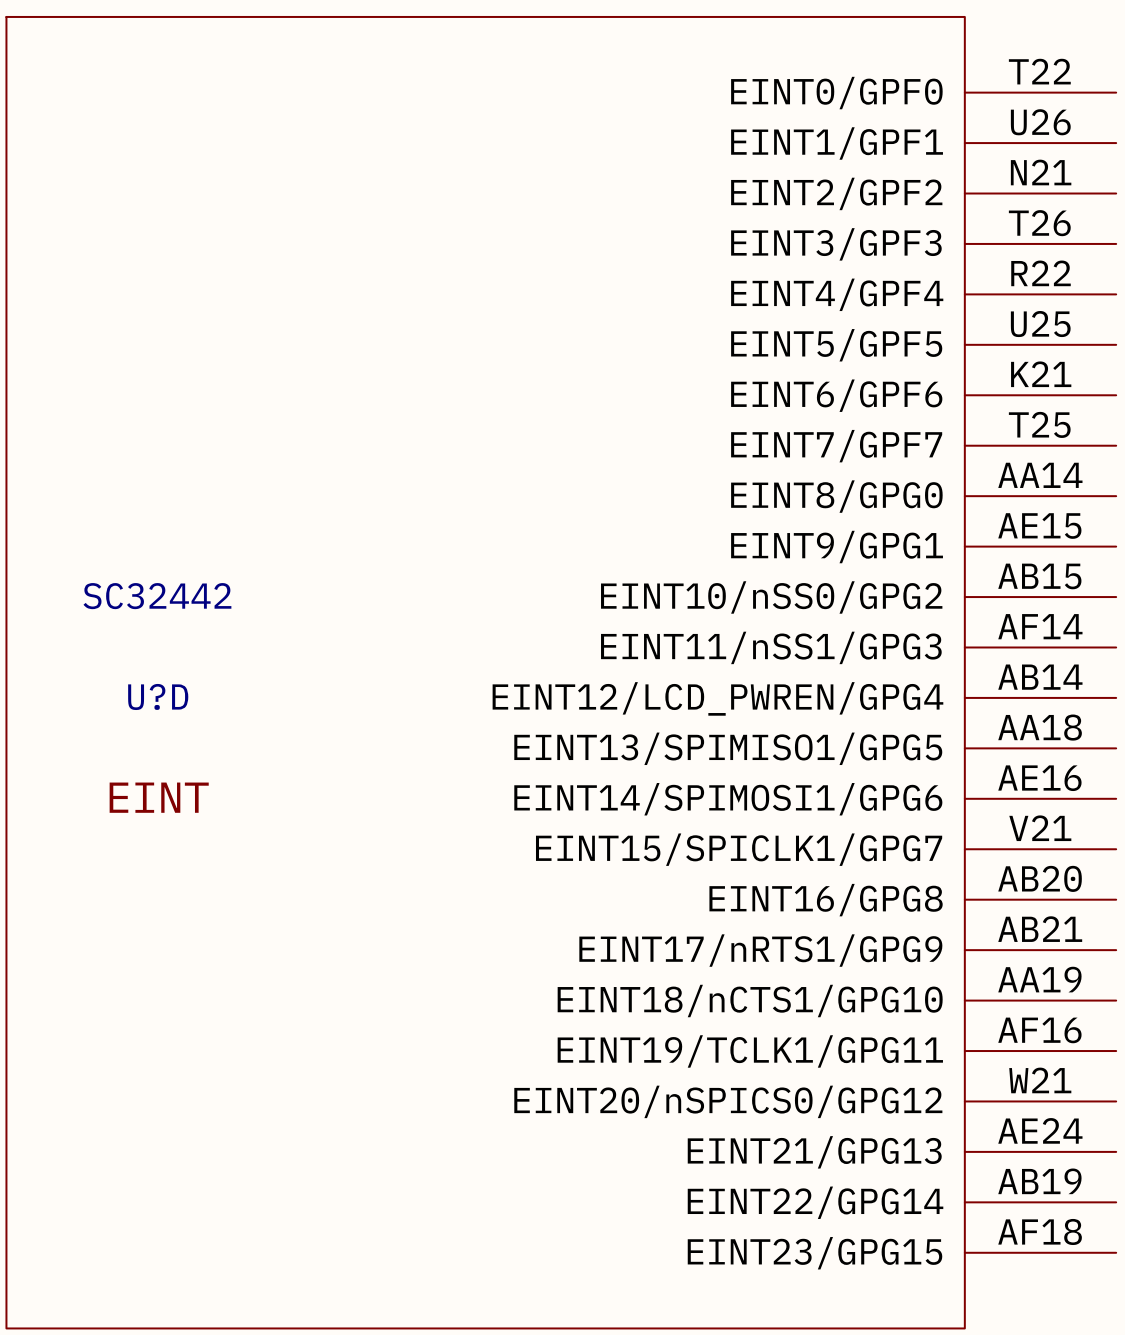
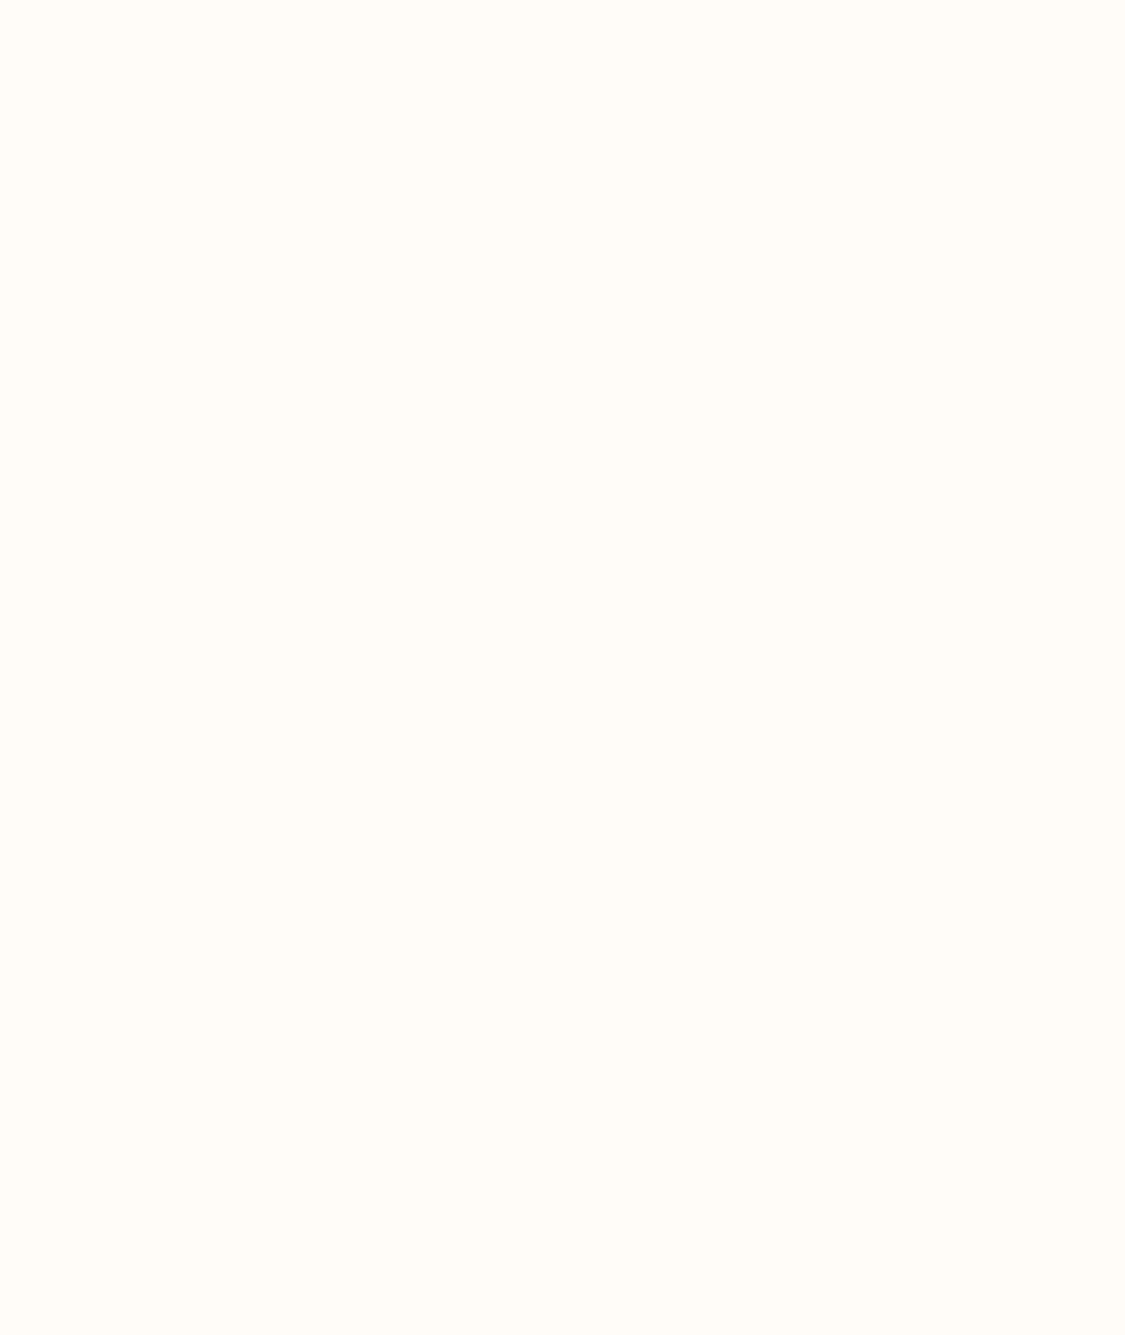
U?D: SC32442 (561, 672) -> none

